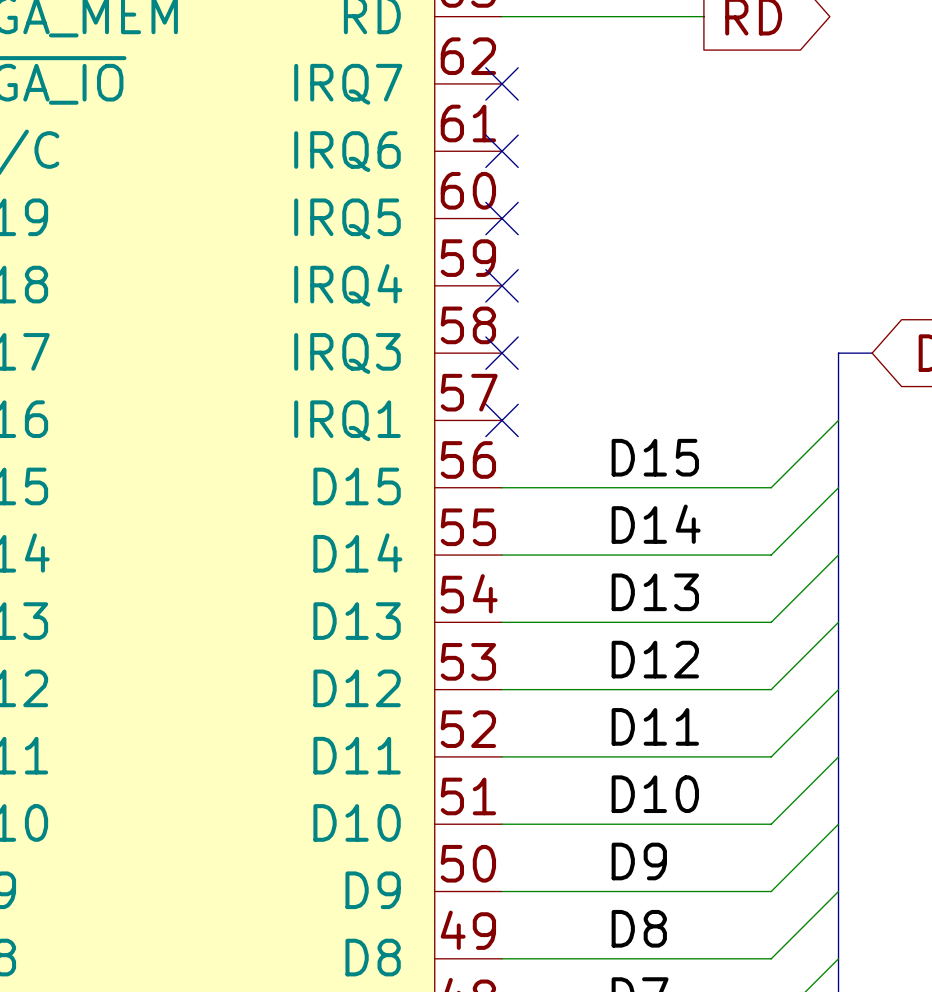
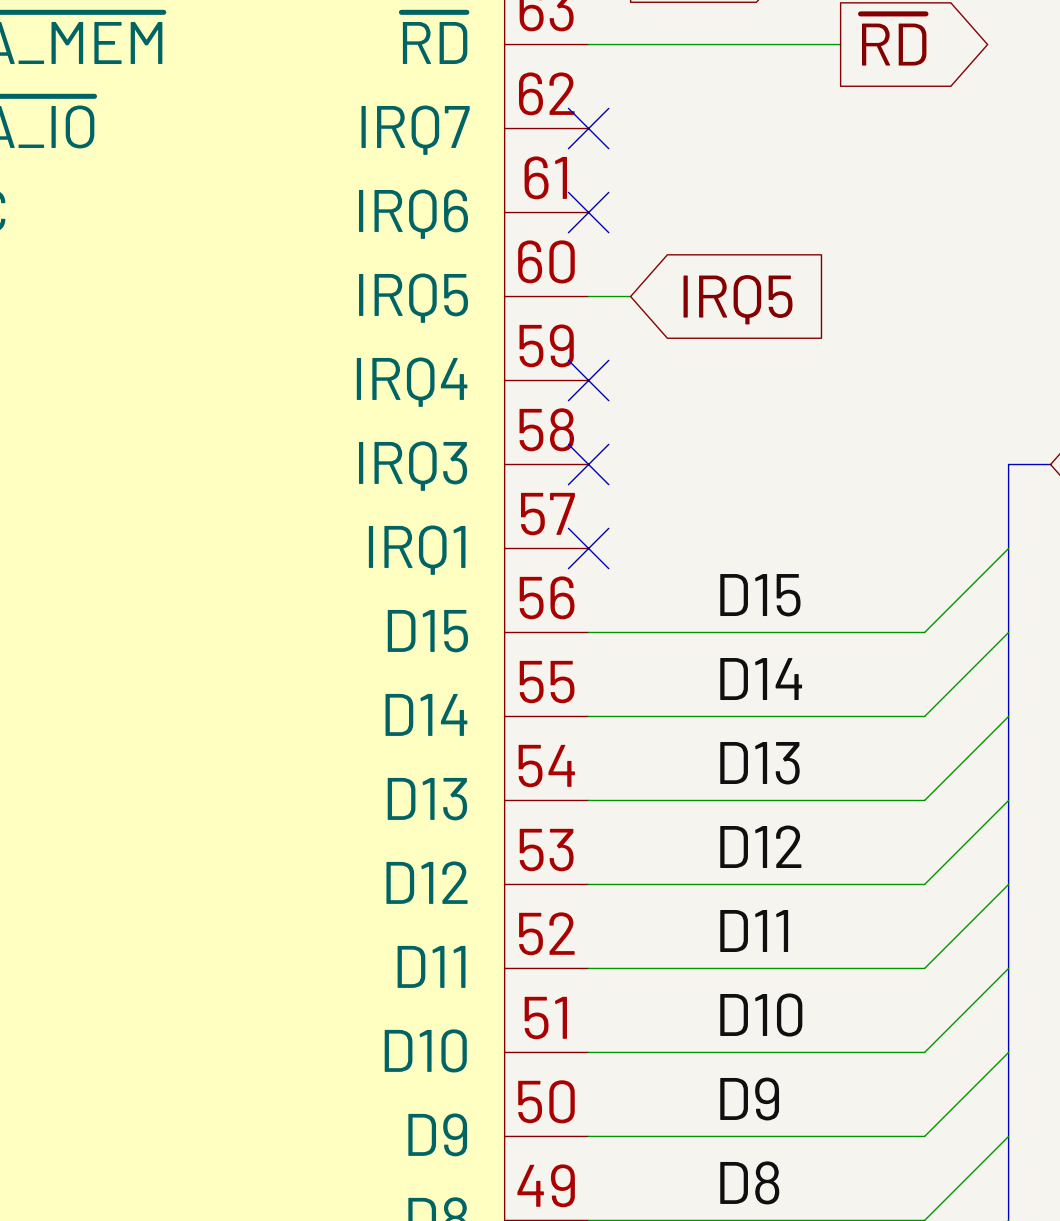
wire: none -> (588, 296) (630, 296)
no-connect mark: (502, 218) -> none
global label: none -> IRQ5 (738, 299)

